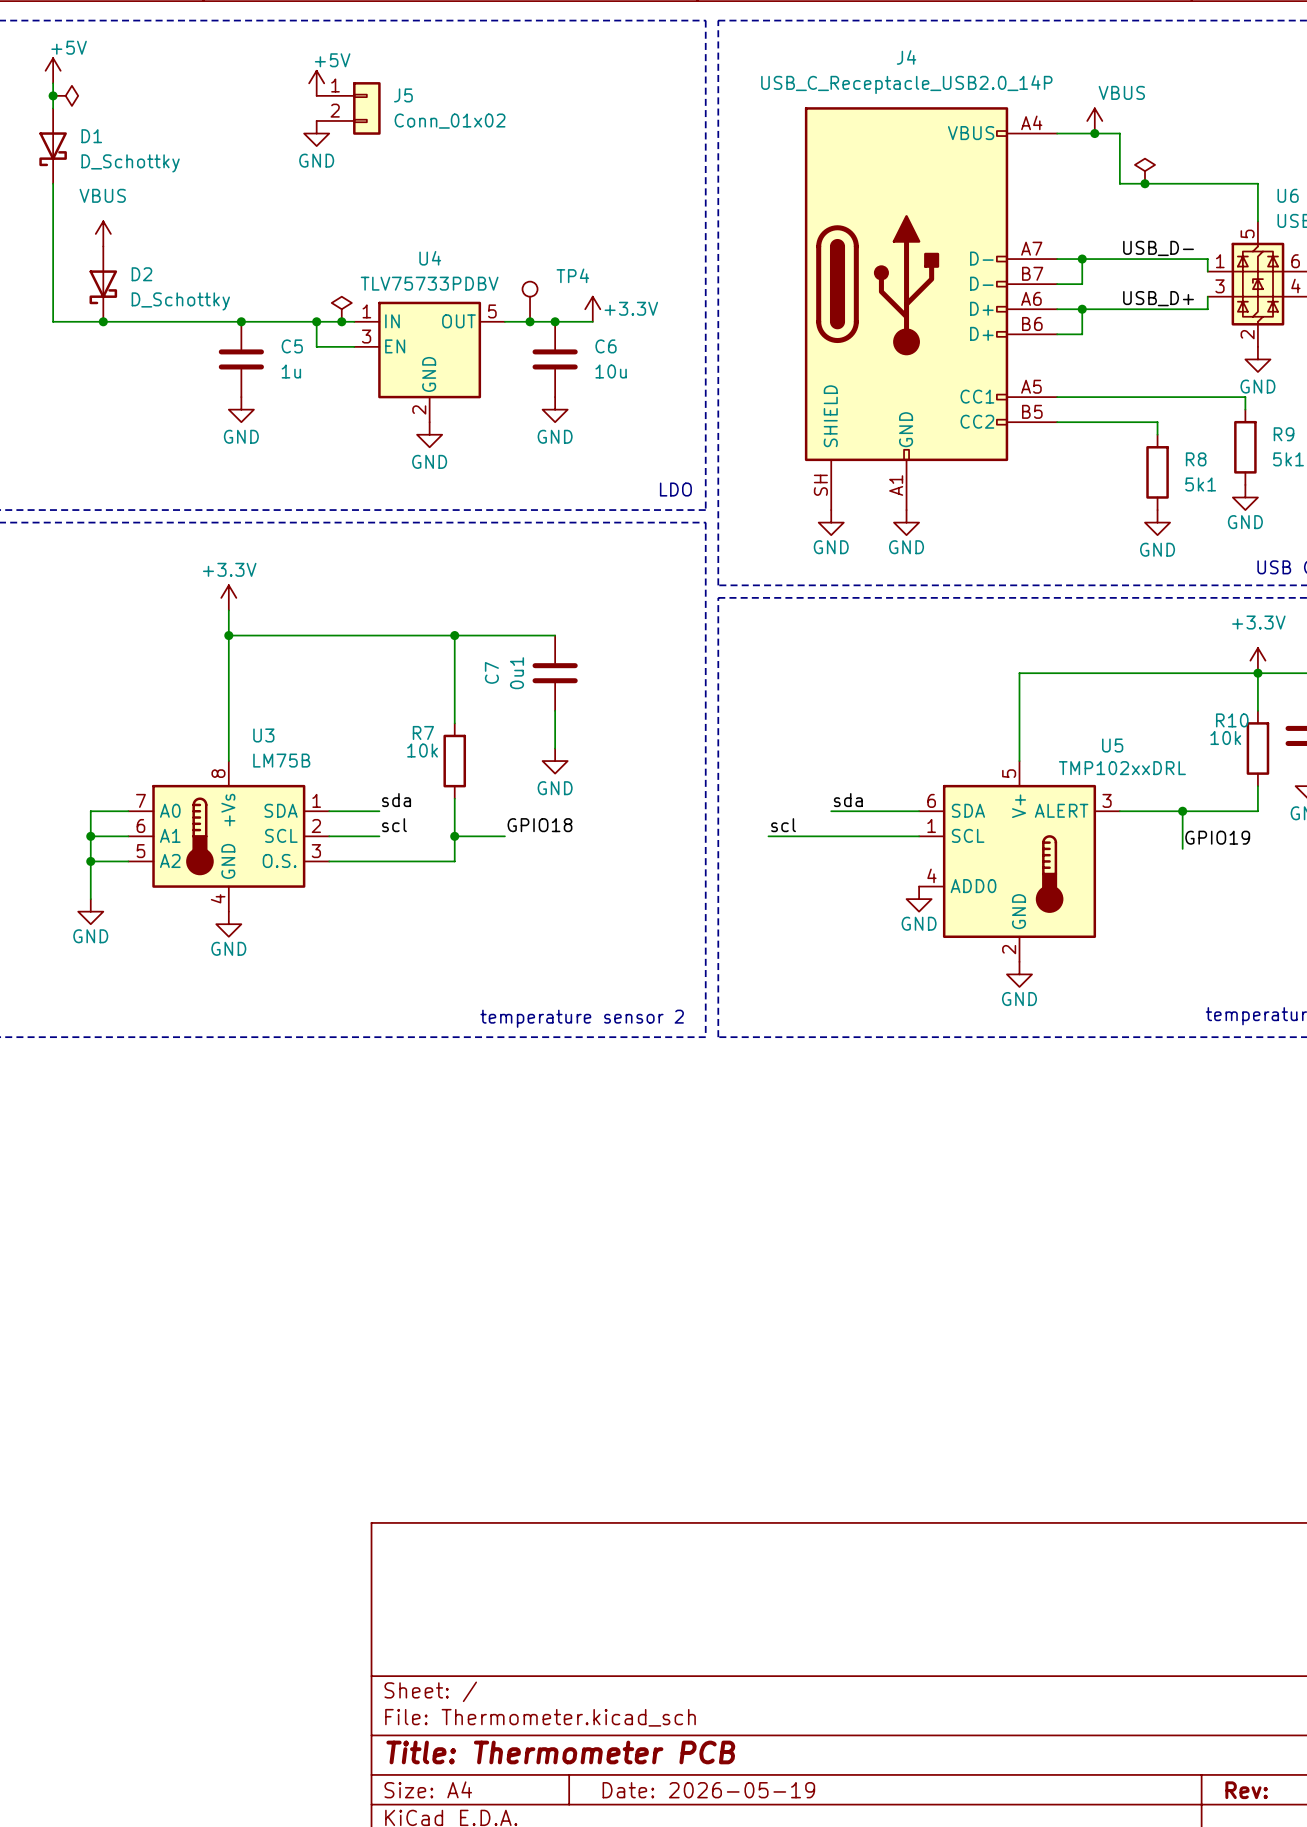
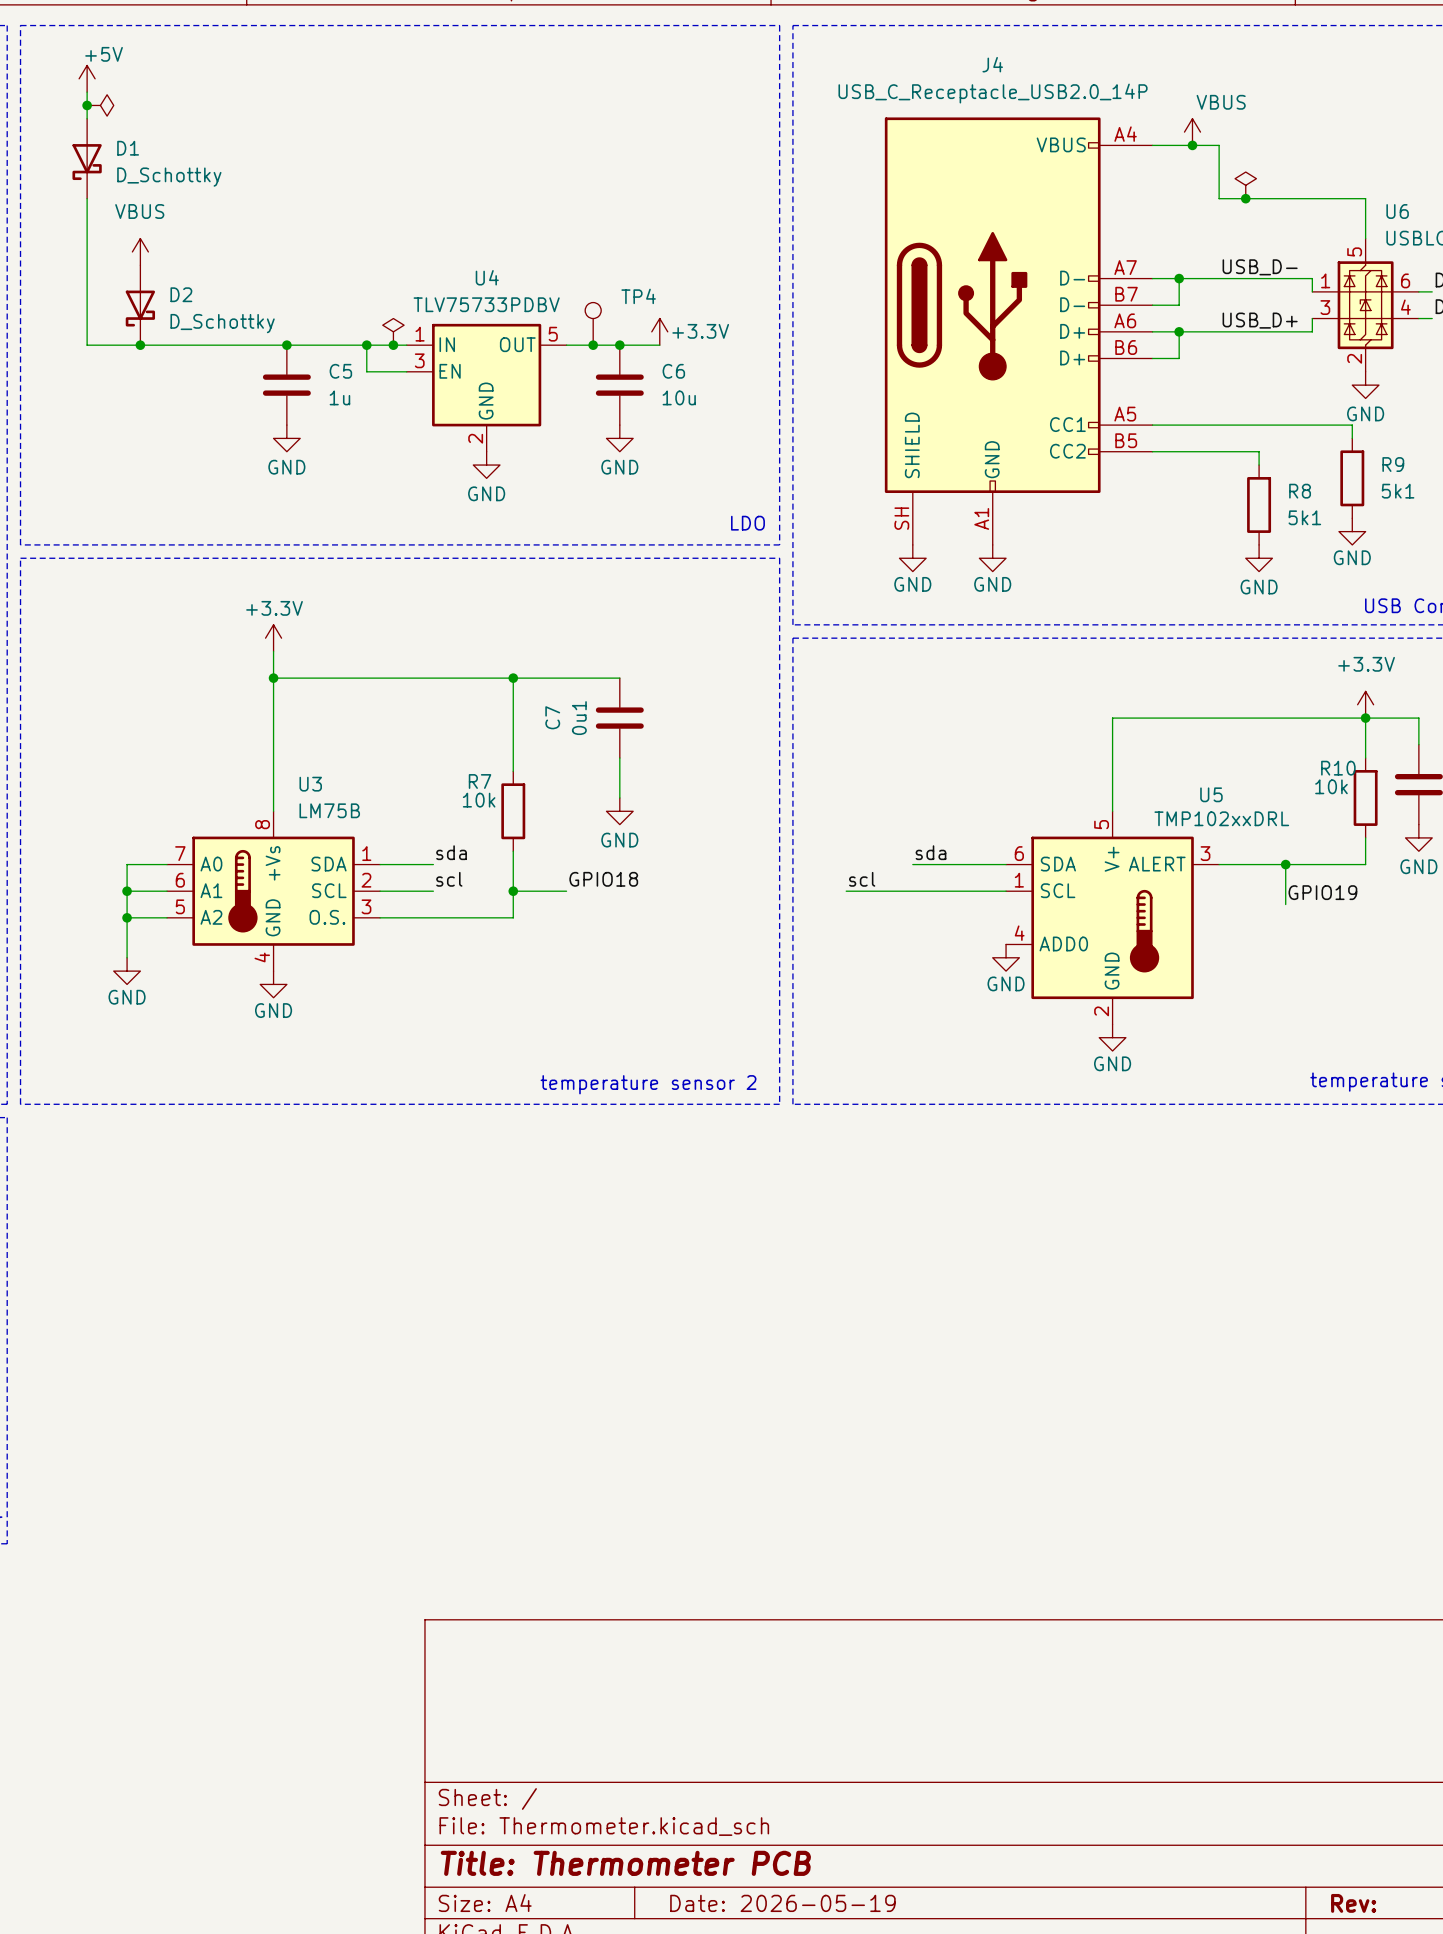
power symbol: +5V (316, 83) -> none
J5: Conn_01x02 (348, 108) -> none
power symbol: GND (316, 133) -> none

